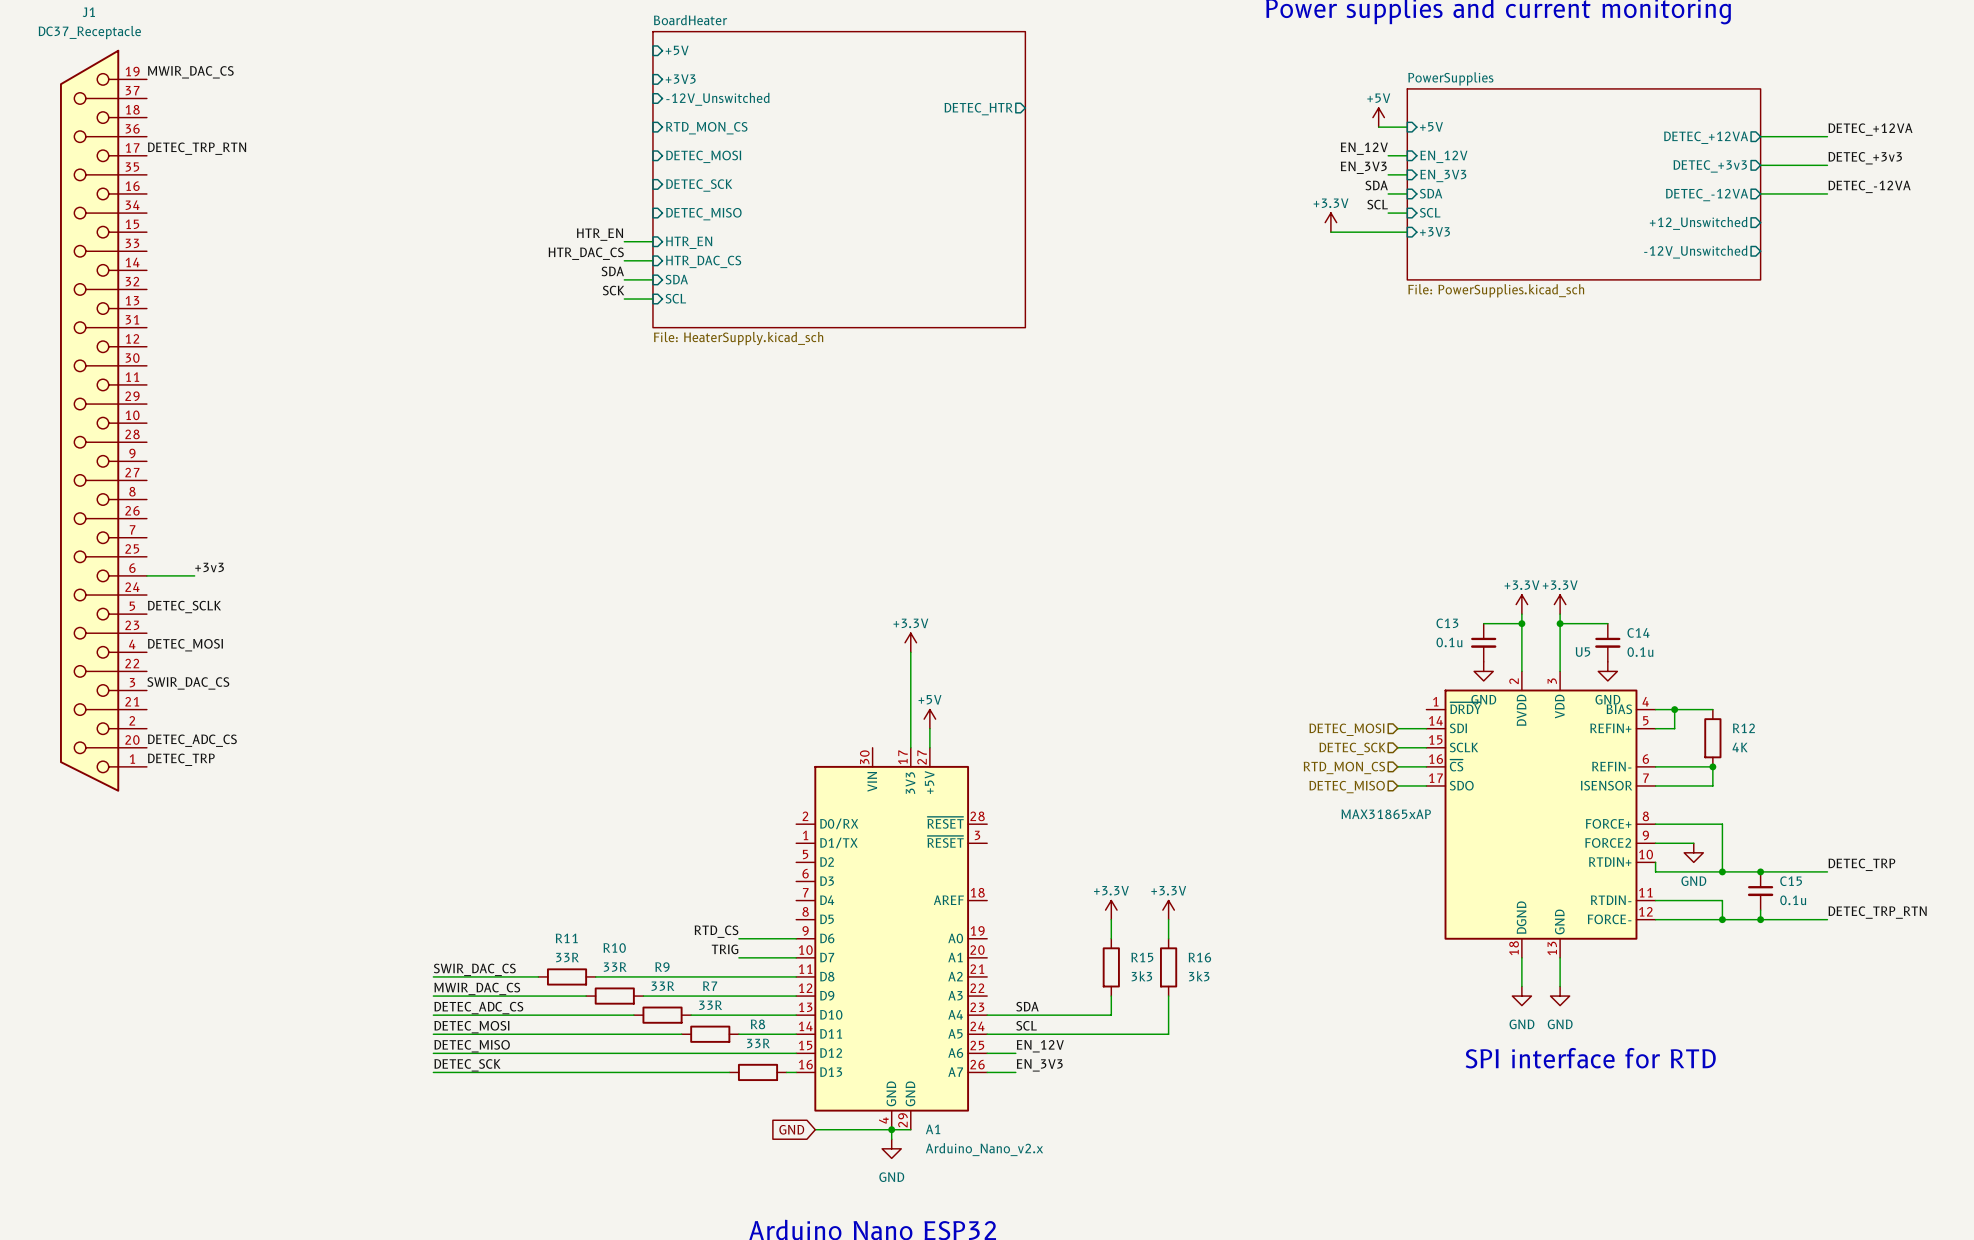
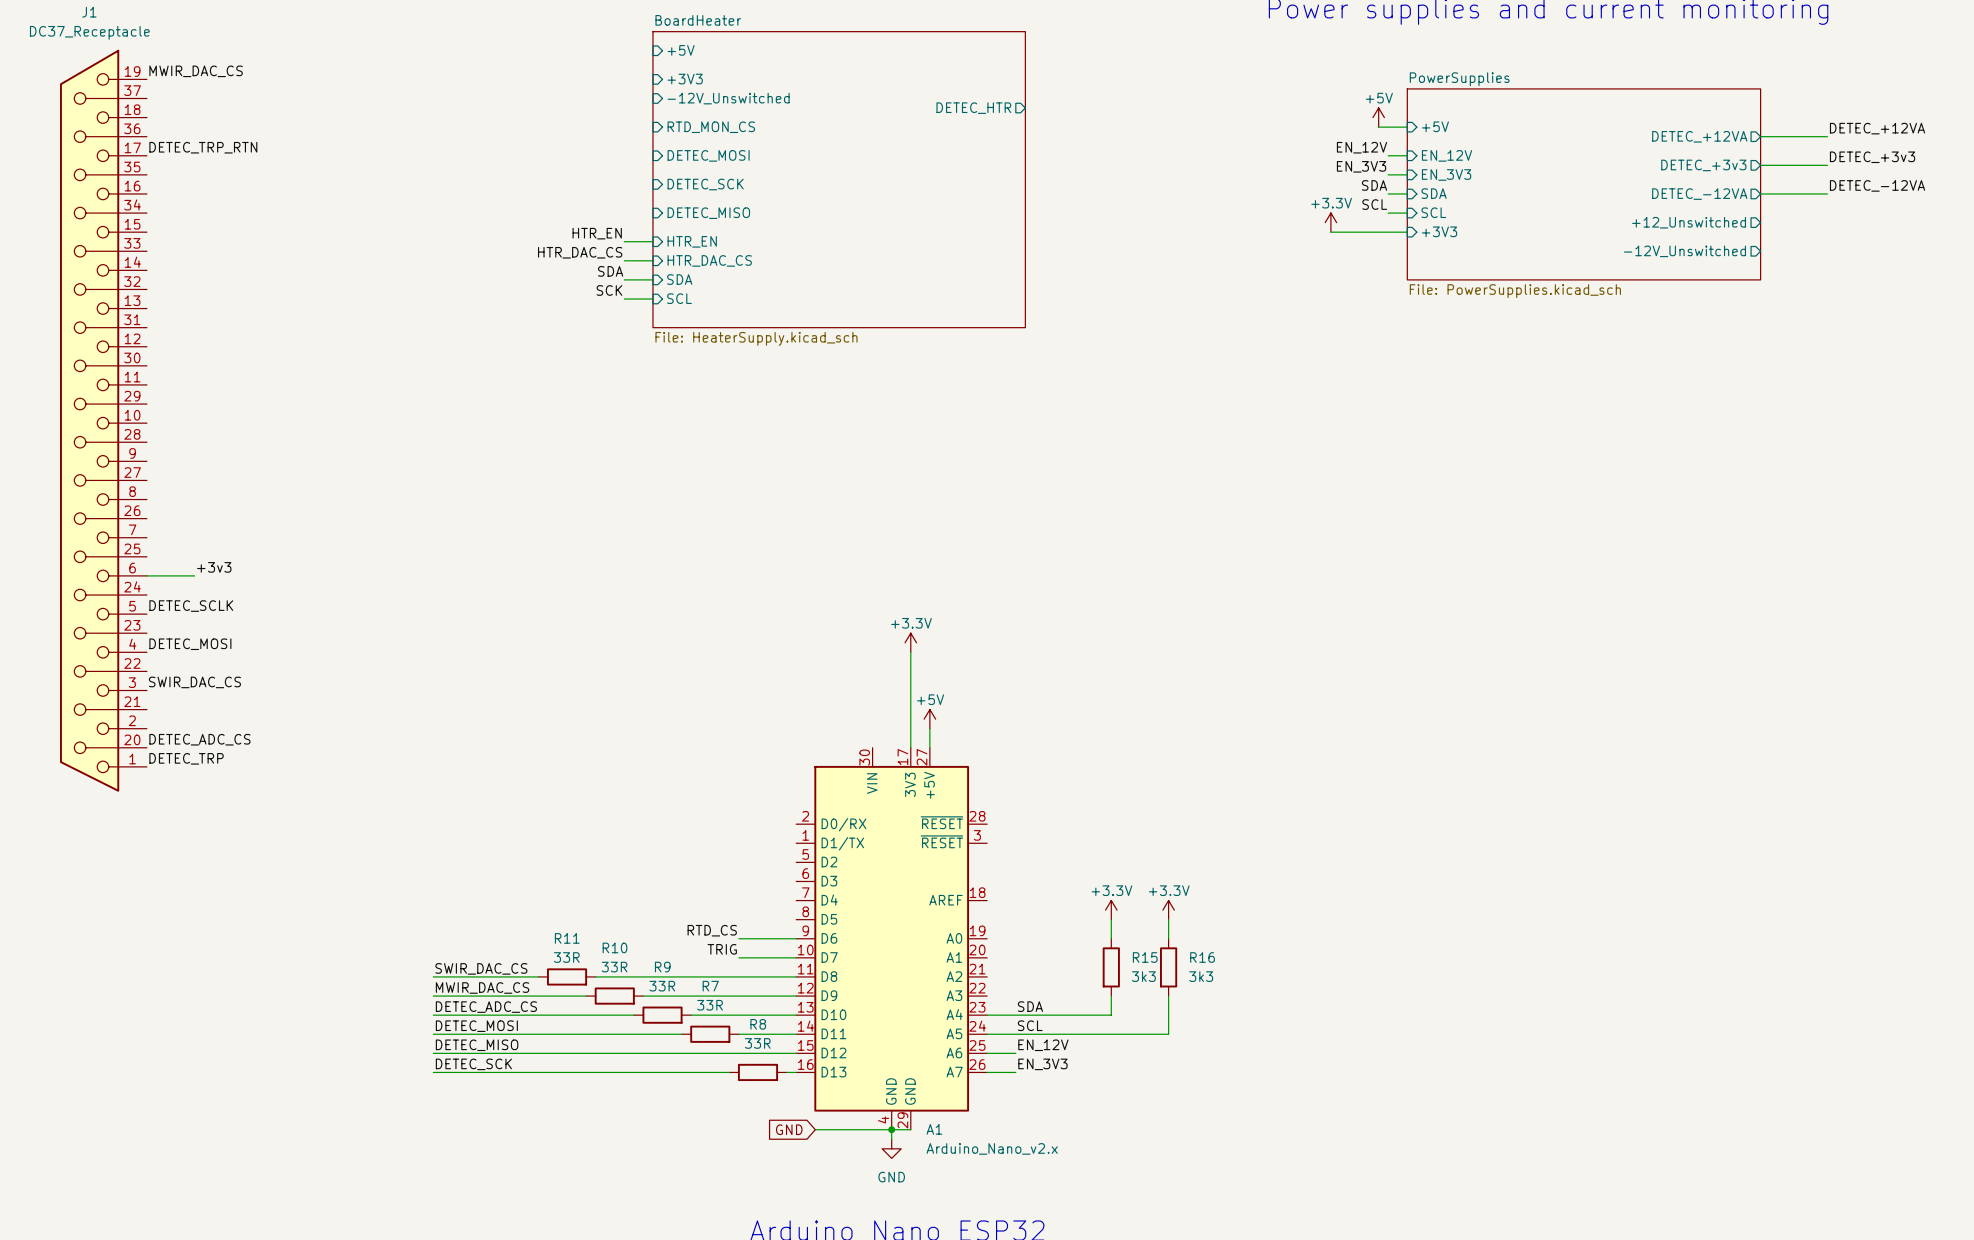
power symbol: +3.3V (1521, 604) -> none
power symbol: +3.3V (1560, 604) -> none
wire: (1521, 614) (1521, 671) -> none
wire: (1560, 614) (1560, 671) -> none
wire: (1483, 623) (1521, 623) -> none
junction: (1521, 623) -> none
wire: (1560, 623) (1607, 623) -> none
junction: (1560, 623) -> none
C13: 0.1u (1483, 642) -> none
C14: 0.1u (1607, 642) -> none
power symbol: GND (1483, 671) -> none
power symbol: GND (1607, 671) -> none
wire: (1655, 709) (1712, 709) -> none
wire: (1674, 709) (1674, 728) (1655, 728) -> none
junction: (1674, 709) -> none
wire: (1397, 728) (1426, 728) -> none
hierarchical label: DETEC_MOSI (1346, 729) -> none
R12: 4K (1712, 738) -> none
wire: (1397, 747) (1426, 747) -> none
hierarchical label: DETEC_SCK (1352, 748) -> none
wire: (1397, 766) (1426, 766) -> none
wire: (1655, 766) (1712, 766) (1712, 785) (1655, 785) -> none
junction: (1712, 766) -> none
hierarchical label: RTD_MON_CS (1344, 767) -> none
wire: (1397, 785) (1426, 785) -> none
hierarchical label: DETEC_MISO (1347, 787) -> none
U5: MAX31865xAP (1540, 814) -> none
wire: (1655, 824) (1722, 824) (1722, 871) -> none
wire: (1655, 843) (1693, 843) -> none
power symbol: GND (1693, 852) -> none
wire: (1655, 862) (1655, 871) (1827, 871) -> none
label: DETEC_TRP (1861, 864) -> none
junction: (1722, 871) -> none
junction: (1760, 871) -> none
C15: 0.1u (1760, 891) -> none
wire: (1655, 900) (1722, 900) (1722, 919) -> none
wire: (1760, 910) (1760, 919) -> none
label: DETEC_TRP_RTN (1877, 912) -> none
wire: (1655, 919) (1827, 919) -> none
junction: (1722, 919) -> none
junction: (1760, 919) -> none
wire: (1521, 957) (1521, 986) -> none
wire: (1560, 957) (1560, 986) -> none
power symbol: GND (1521, 996) -> none
power symbol: GND (1560, 996) -> none
text: SPI interface for RTD (1590, 1058) -> none

